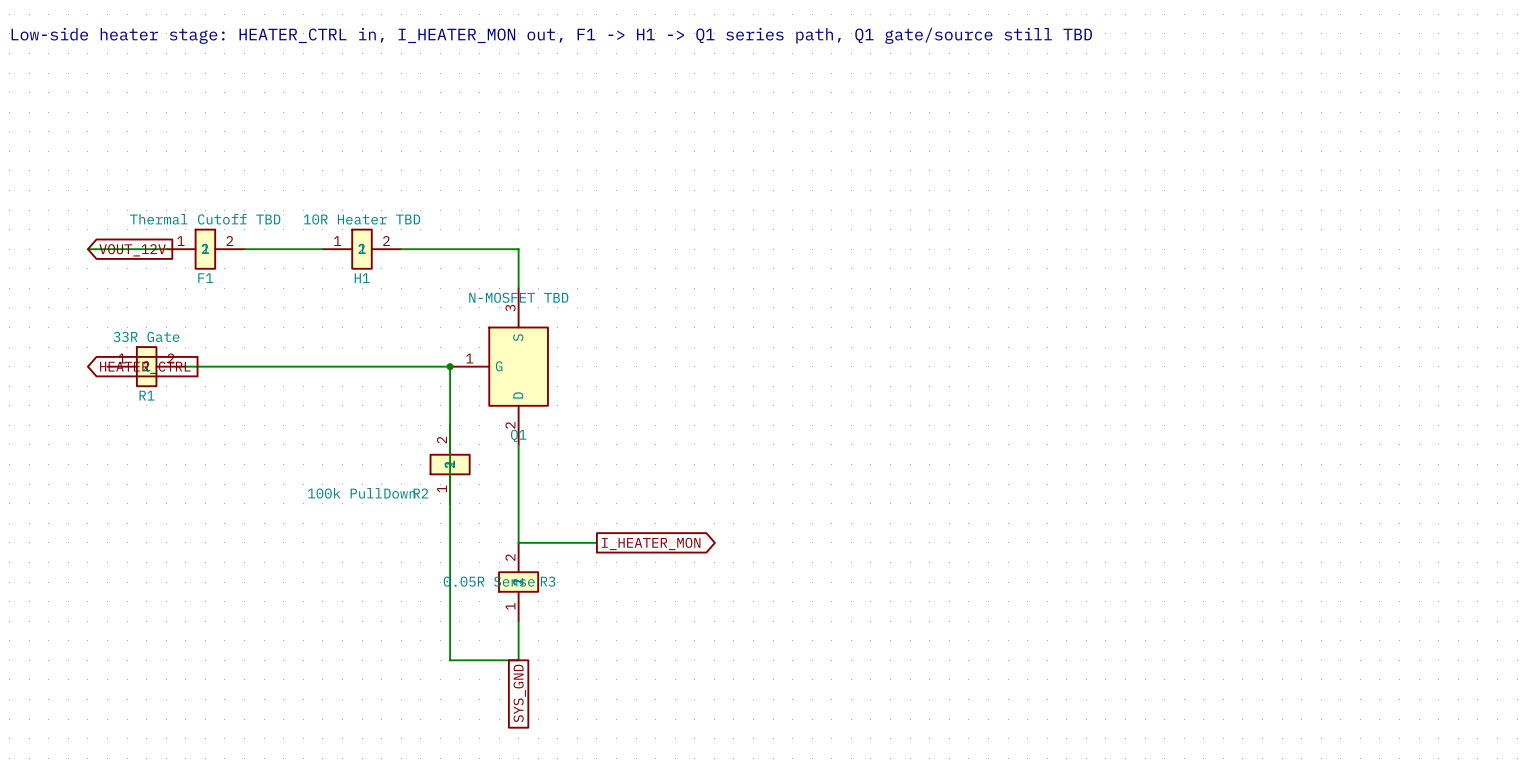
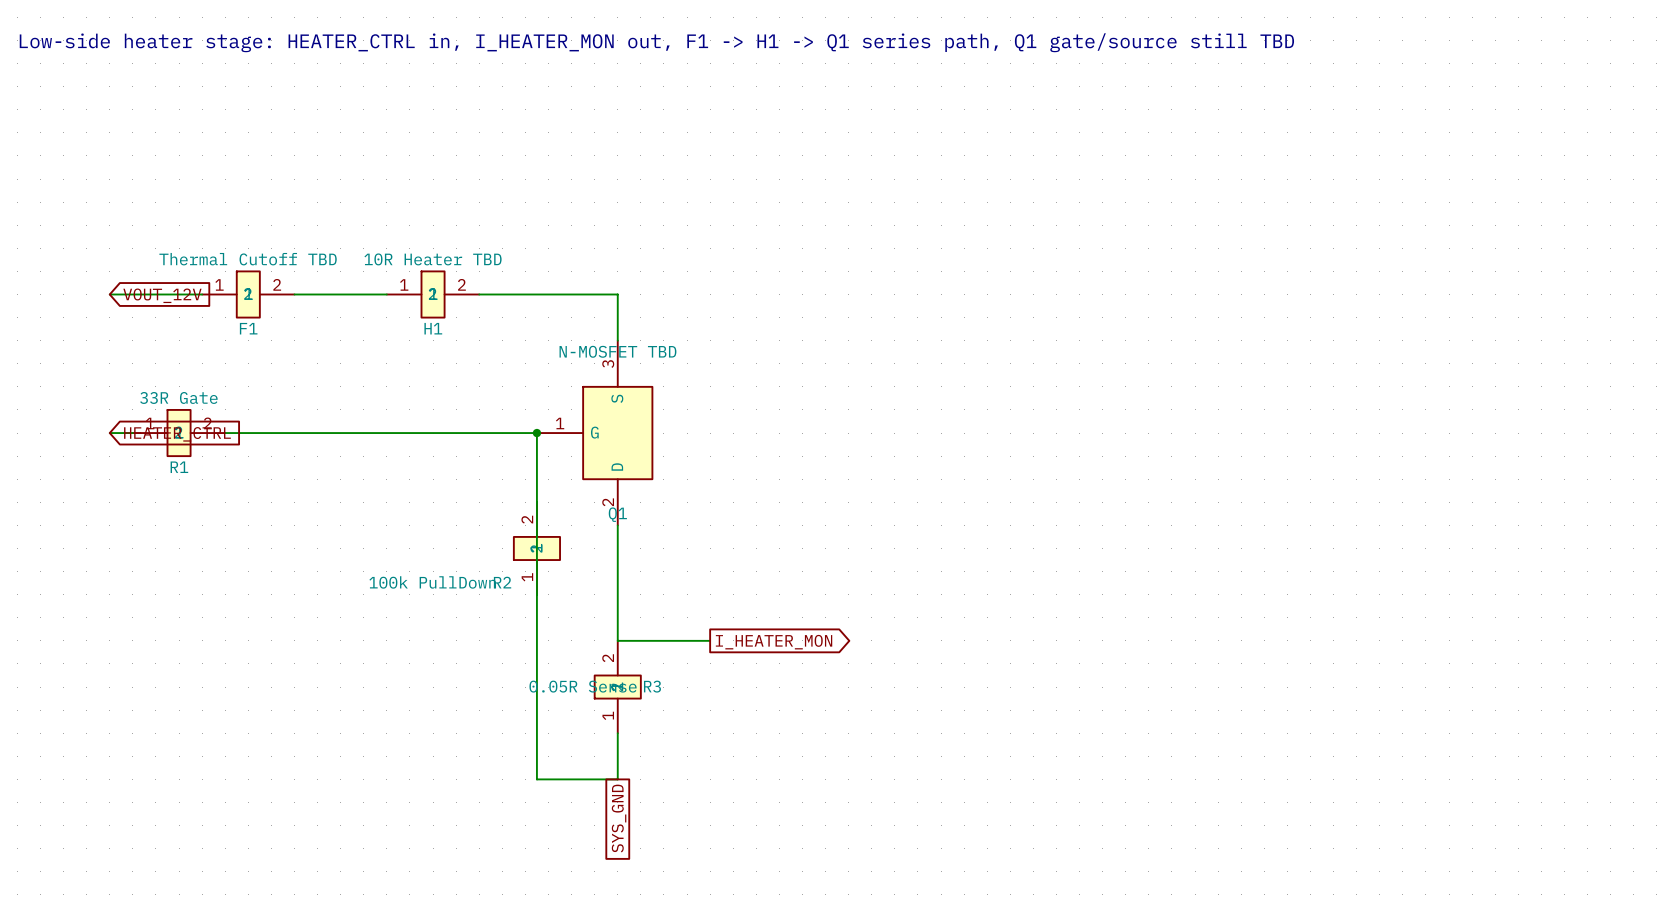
wire: none -> (109, 433) (132, 433)

